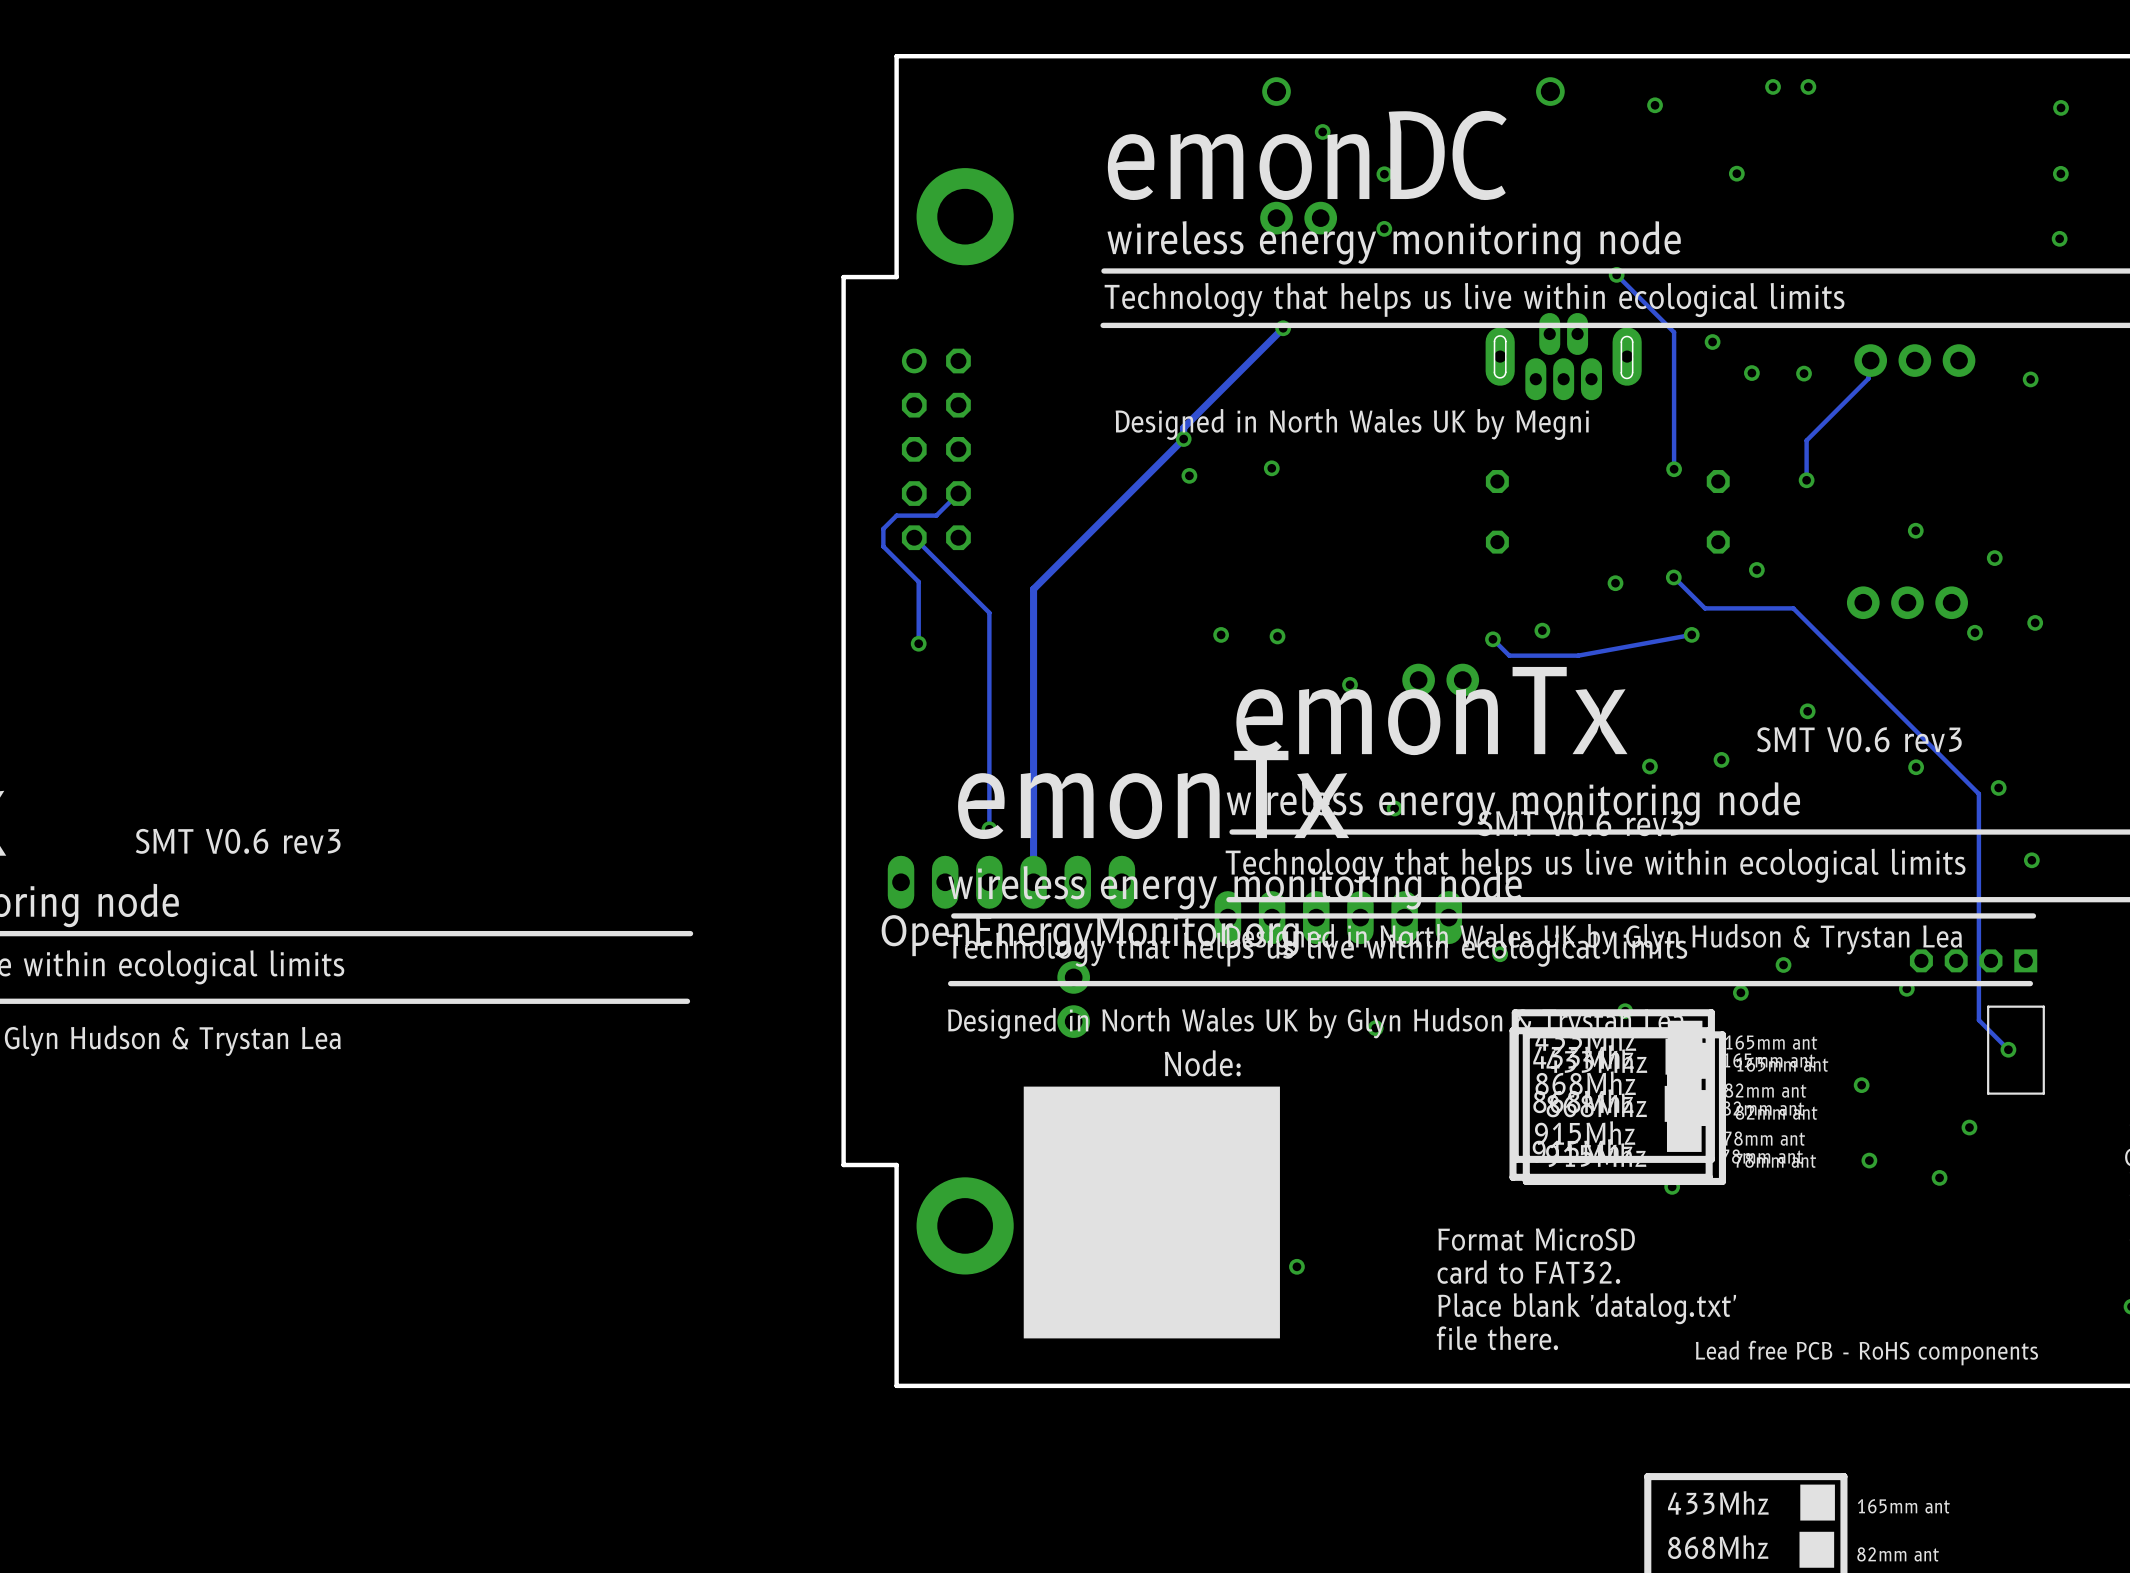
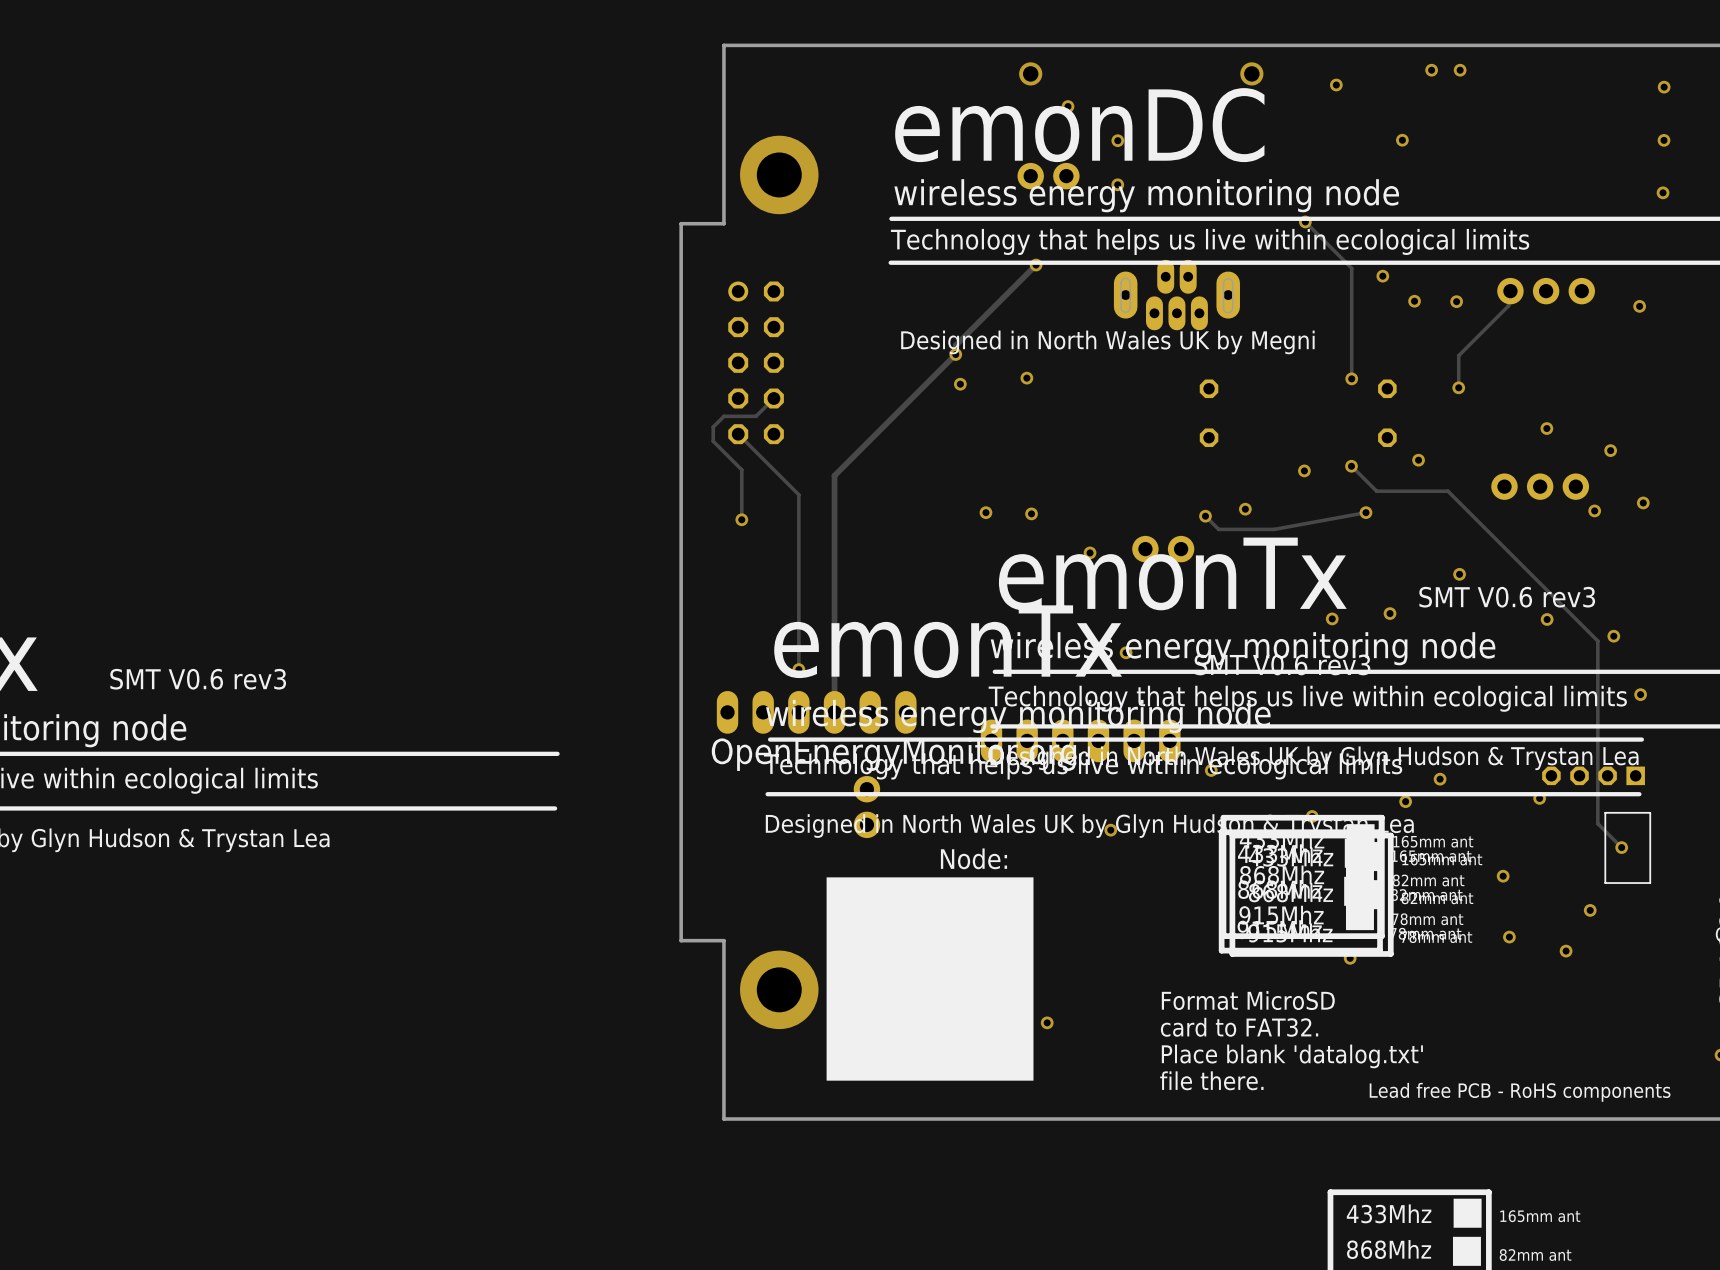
part position: (1563, 356) -> (1176, 295)

